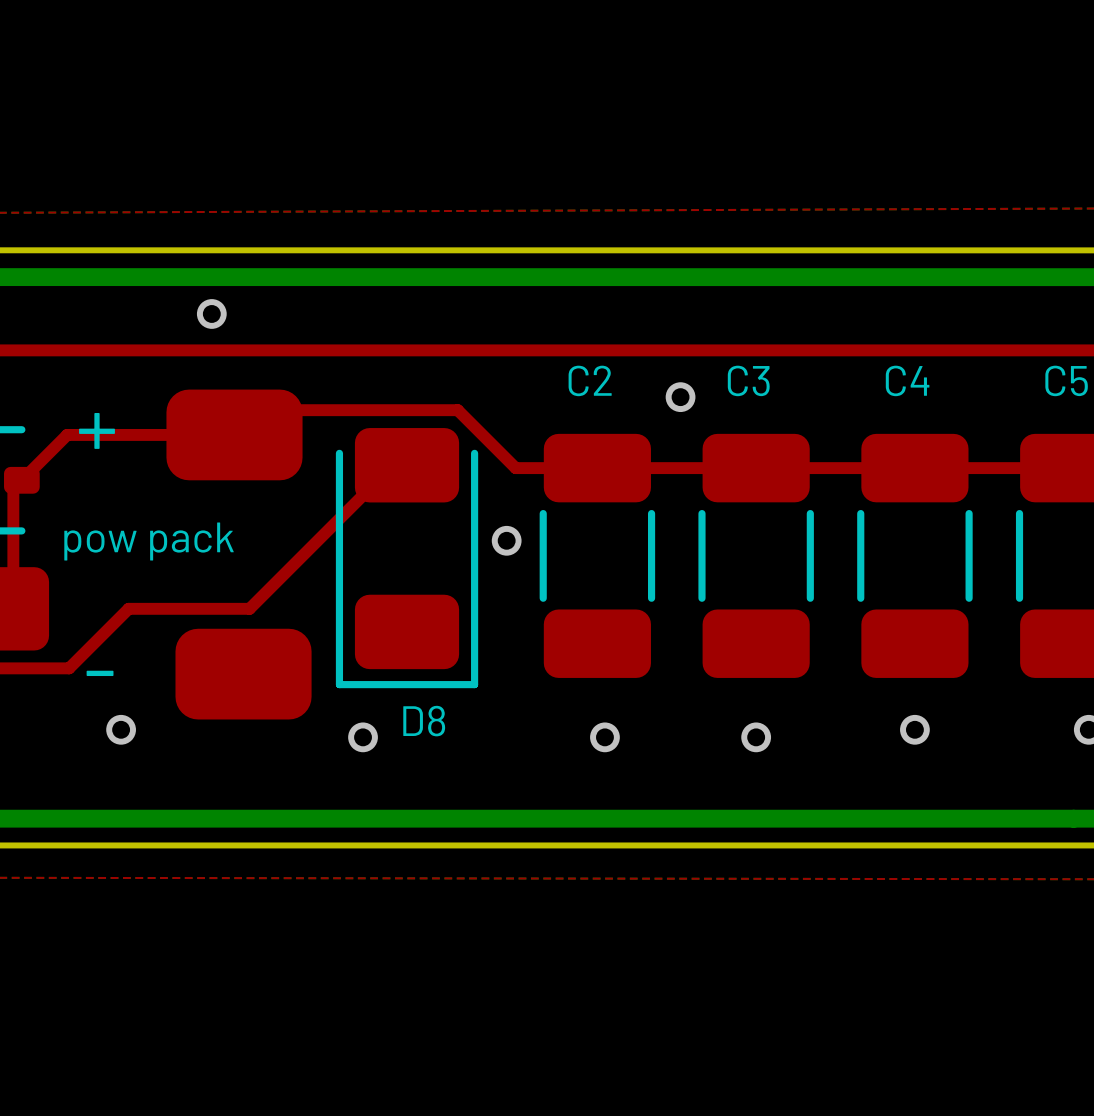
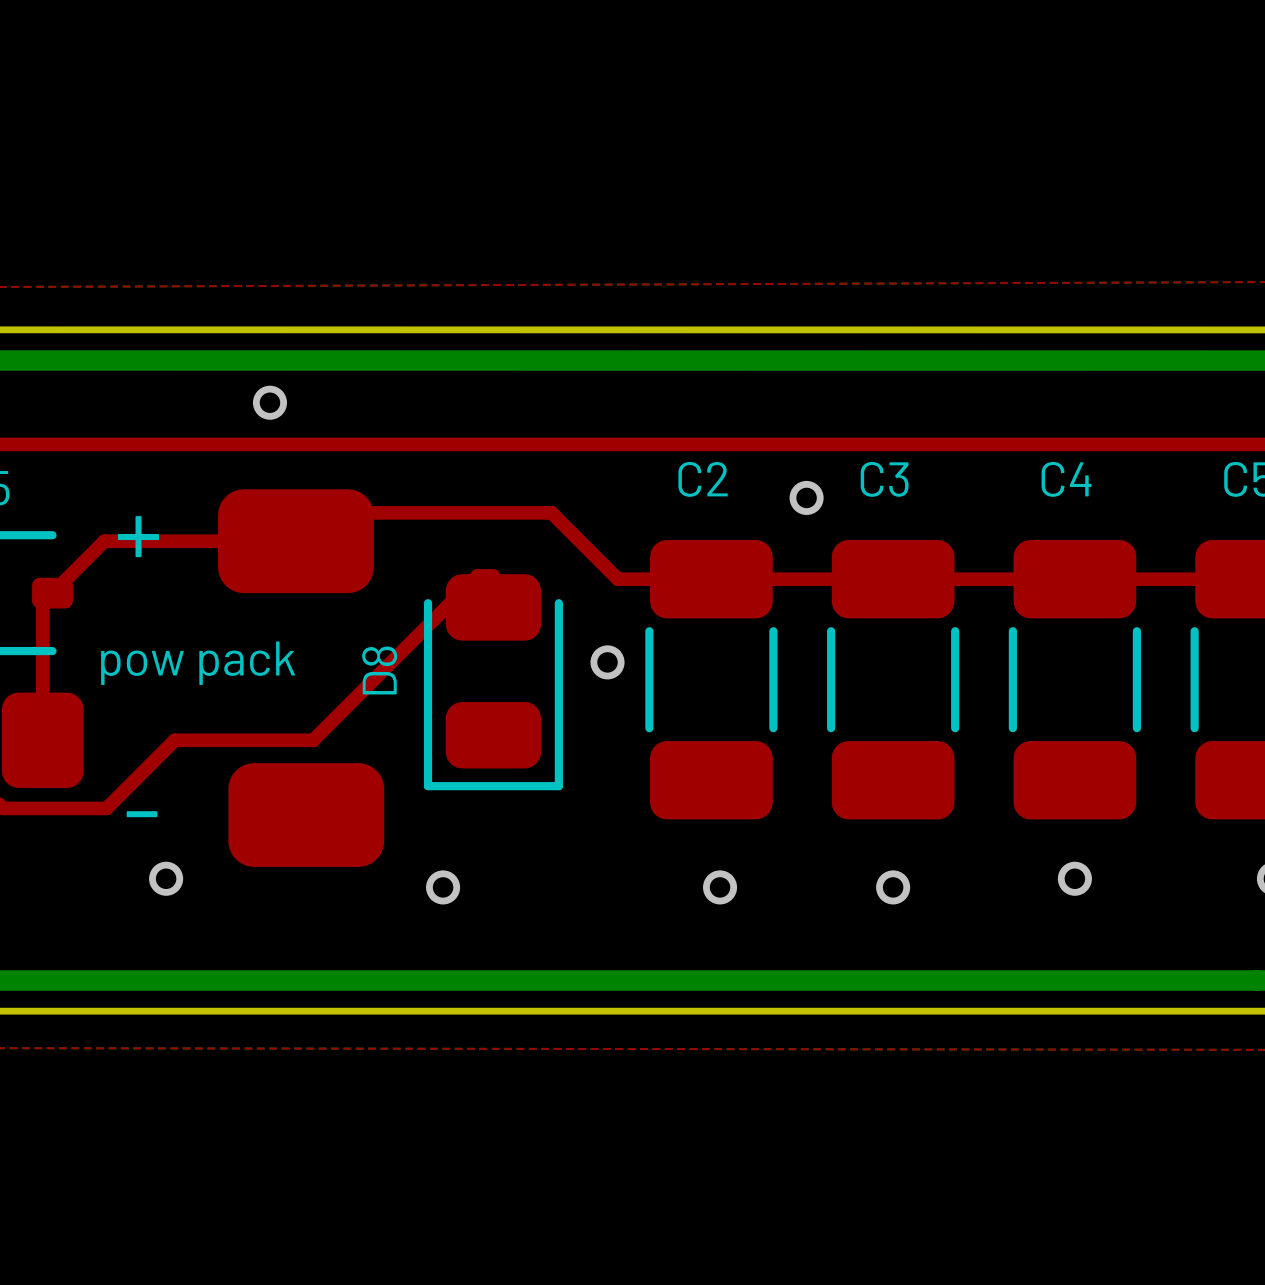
D8 footprint: [335, 428, 479, 689] -> [423, 574, 563, 791]
D8 name rotation: 0° (424, 721) -> 90° counterclockwise (379, 670)
D8 name position: D8 (424, 721) -> D8 (379, 670)

